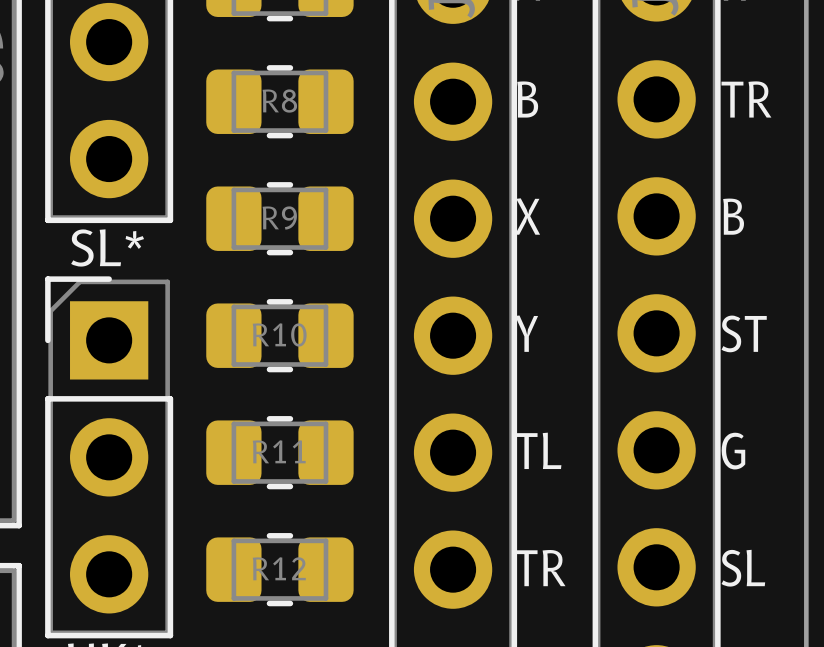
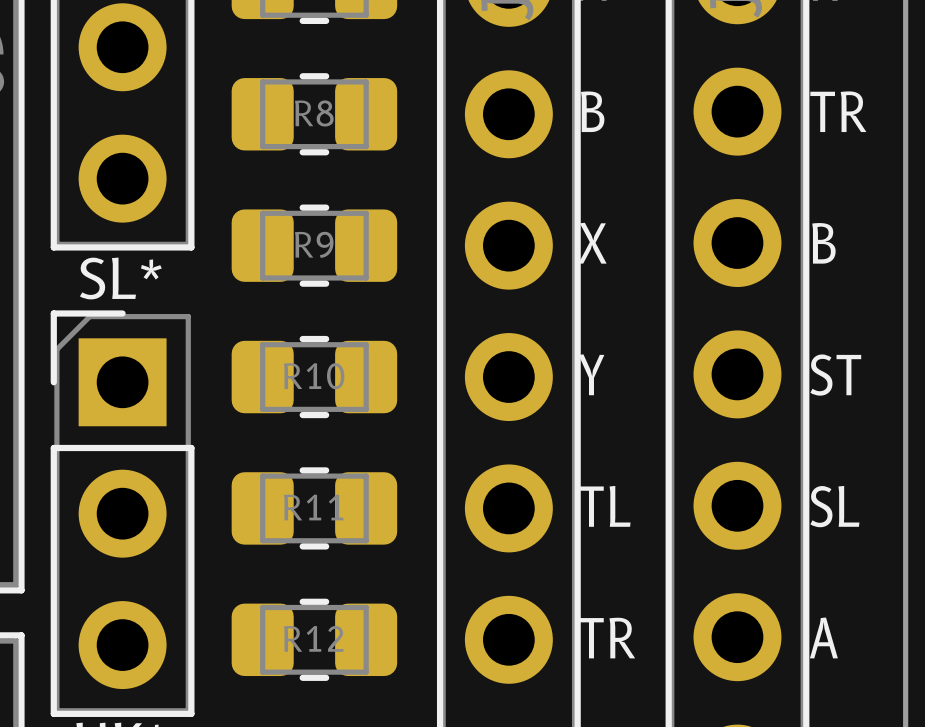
text: G (733, 451) -> SL (834, 506)
text: SL (743, 568) -> A (823, 637)

